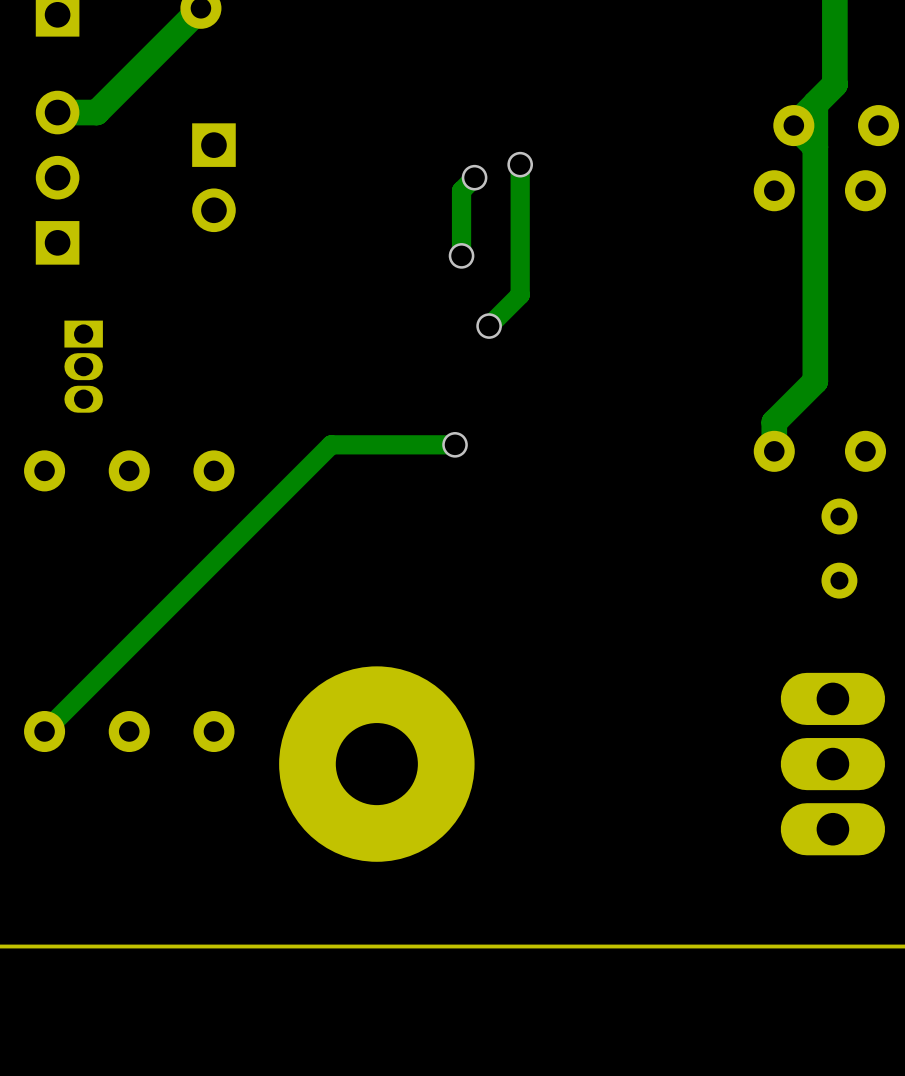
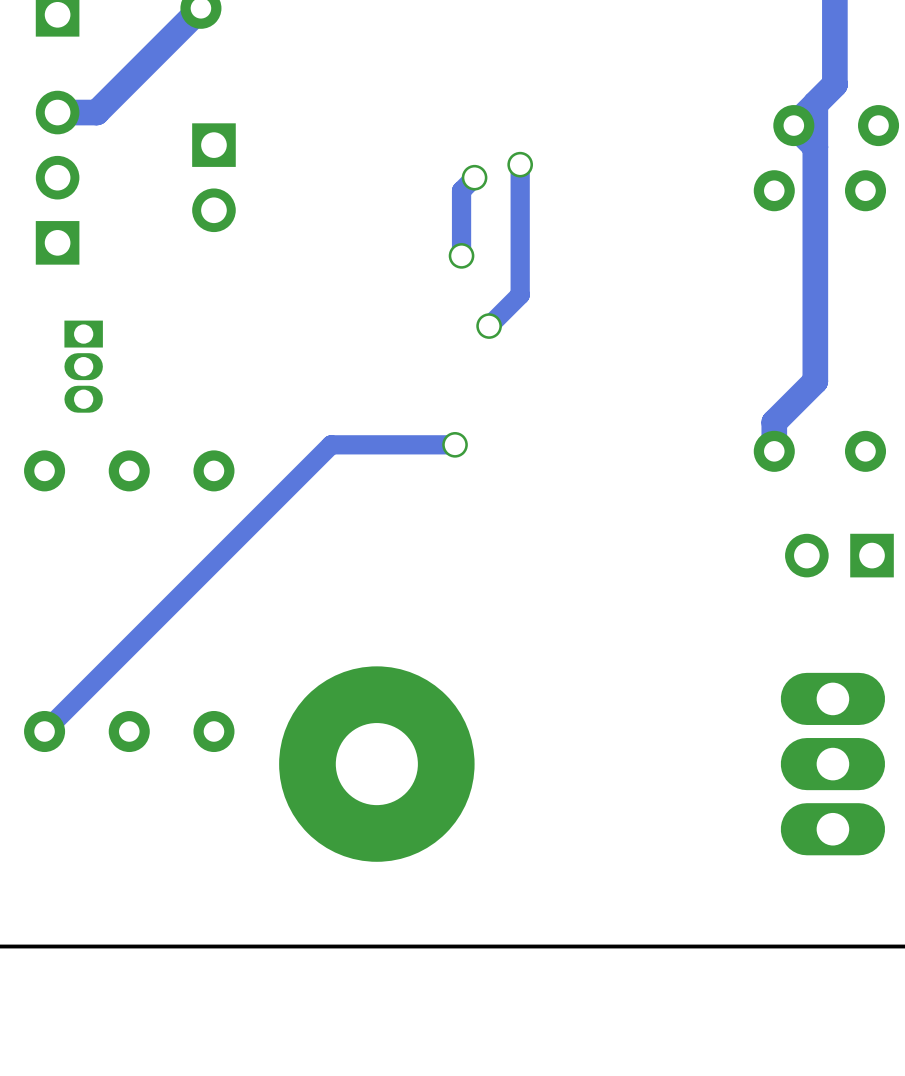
part footprint: [821, 498, 858, 599] -> [785, 533, 894, 578]

